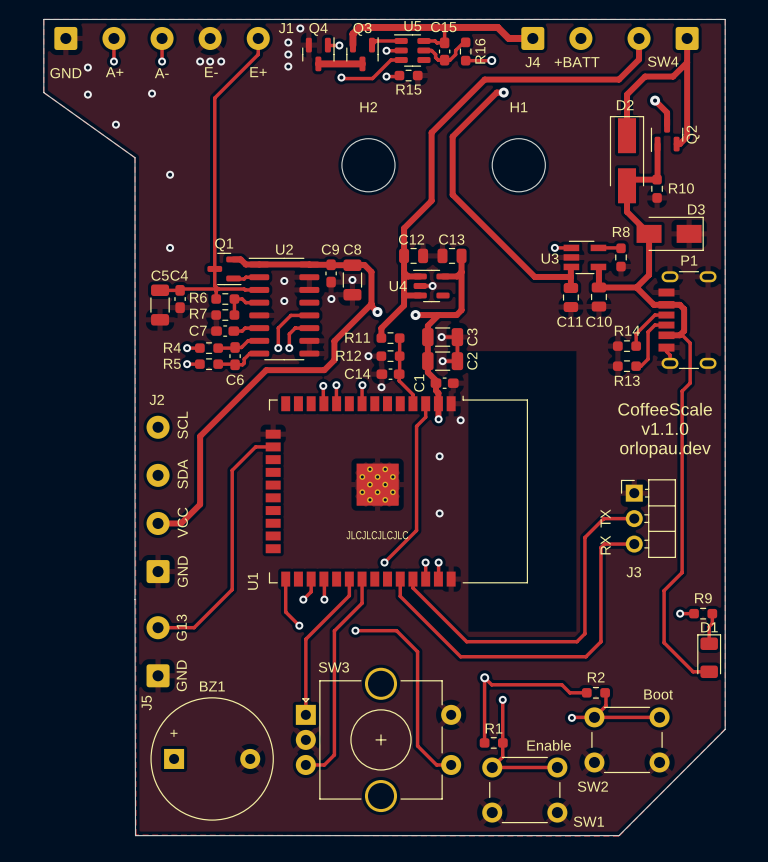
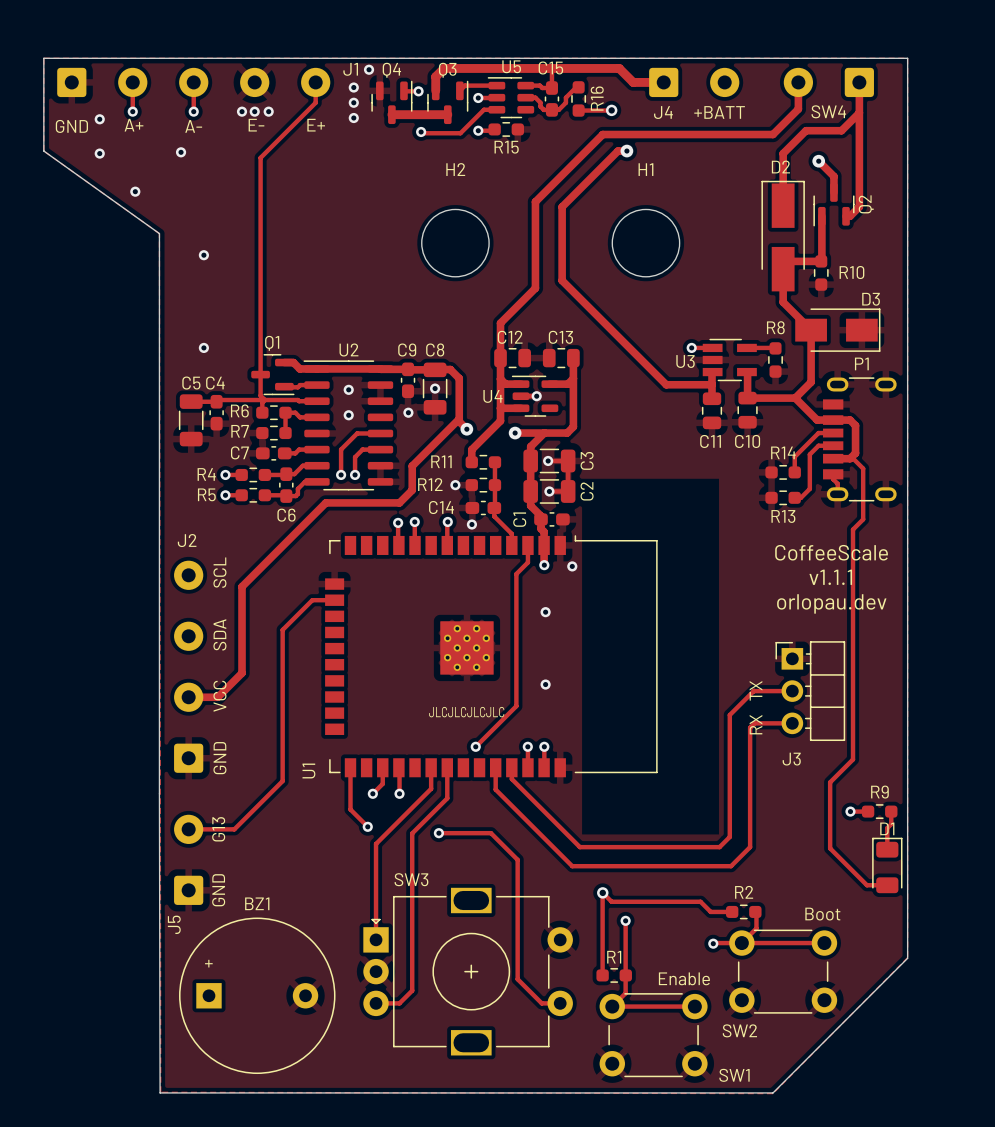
text: v1.1.0 (664, 428) -> v1.1.1 (830, 577)
SW3 footprint: [295, 667, 462, 813] -> [363, 887, 573, 1056]

